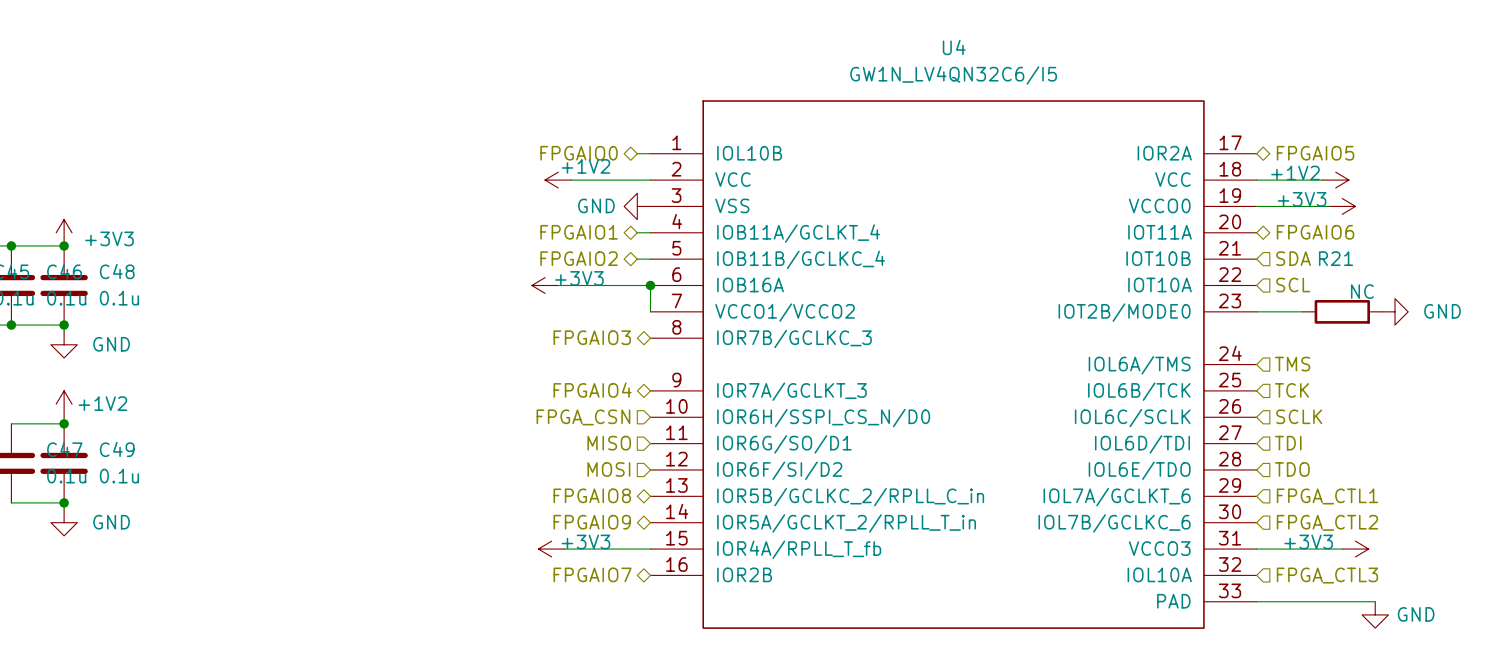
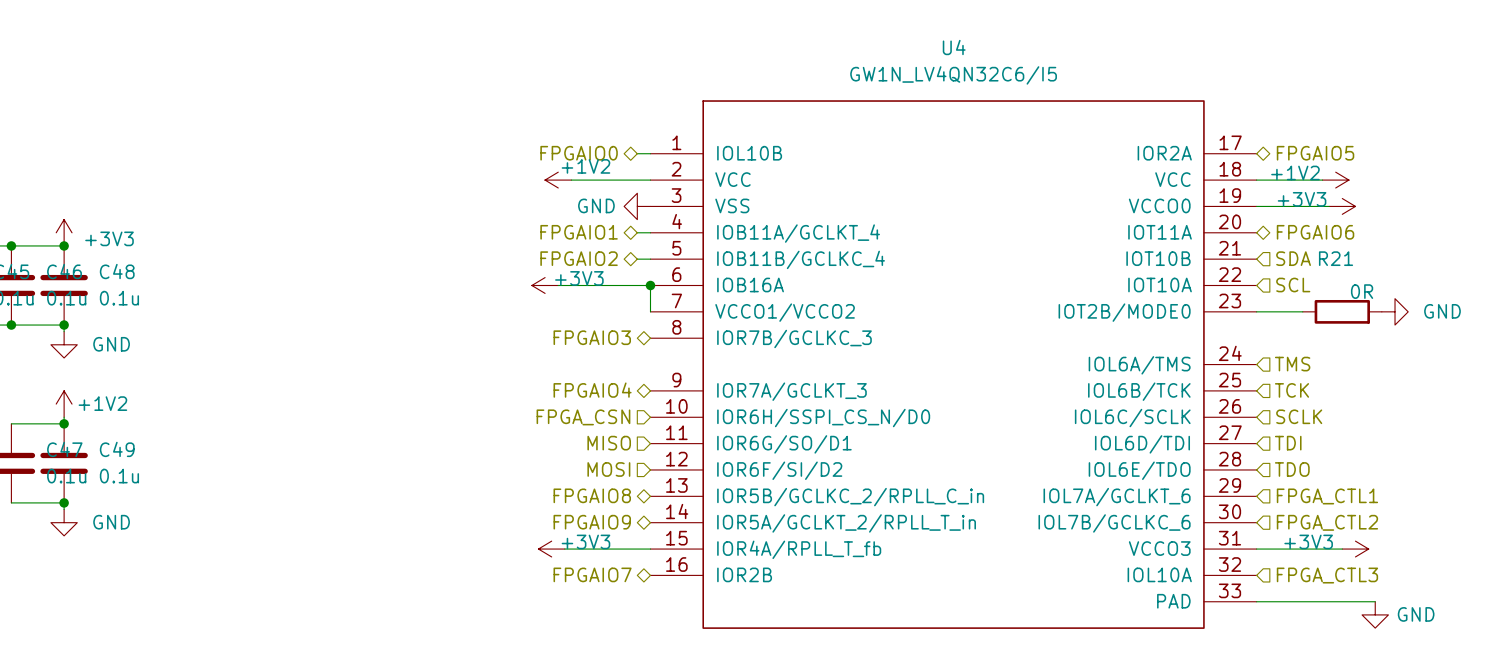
R21 value: NC (1362, 291) -> 0R (1362, 291)

